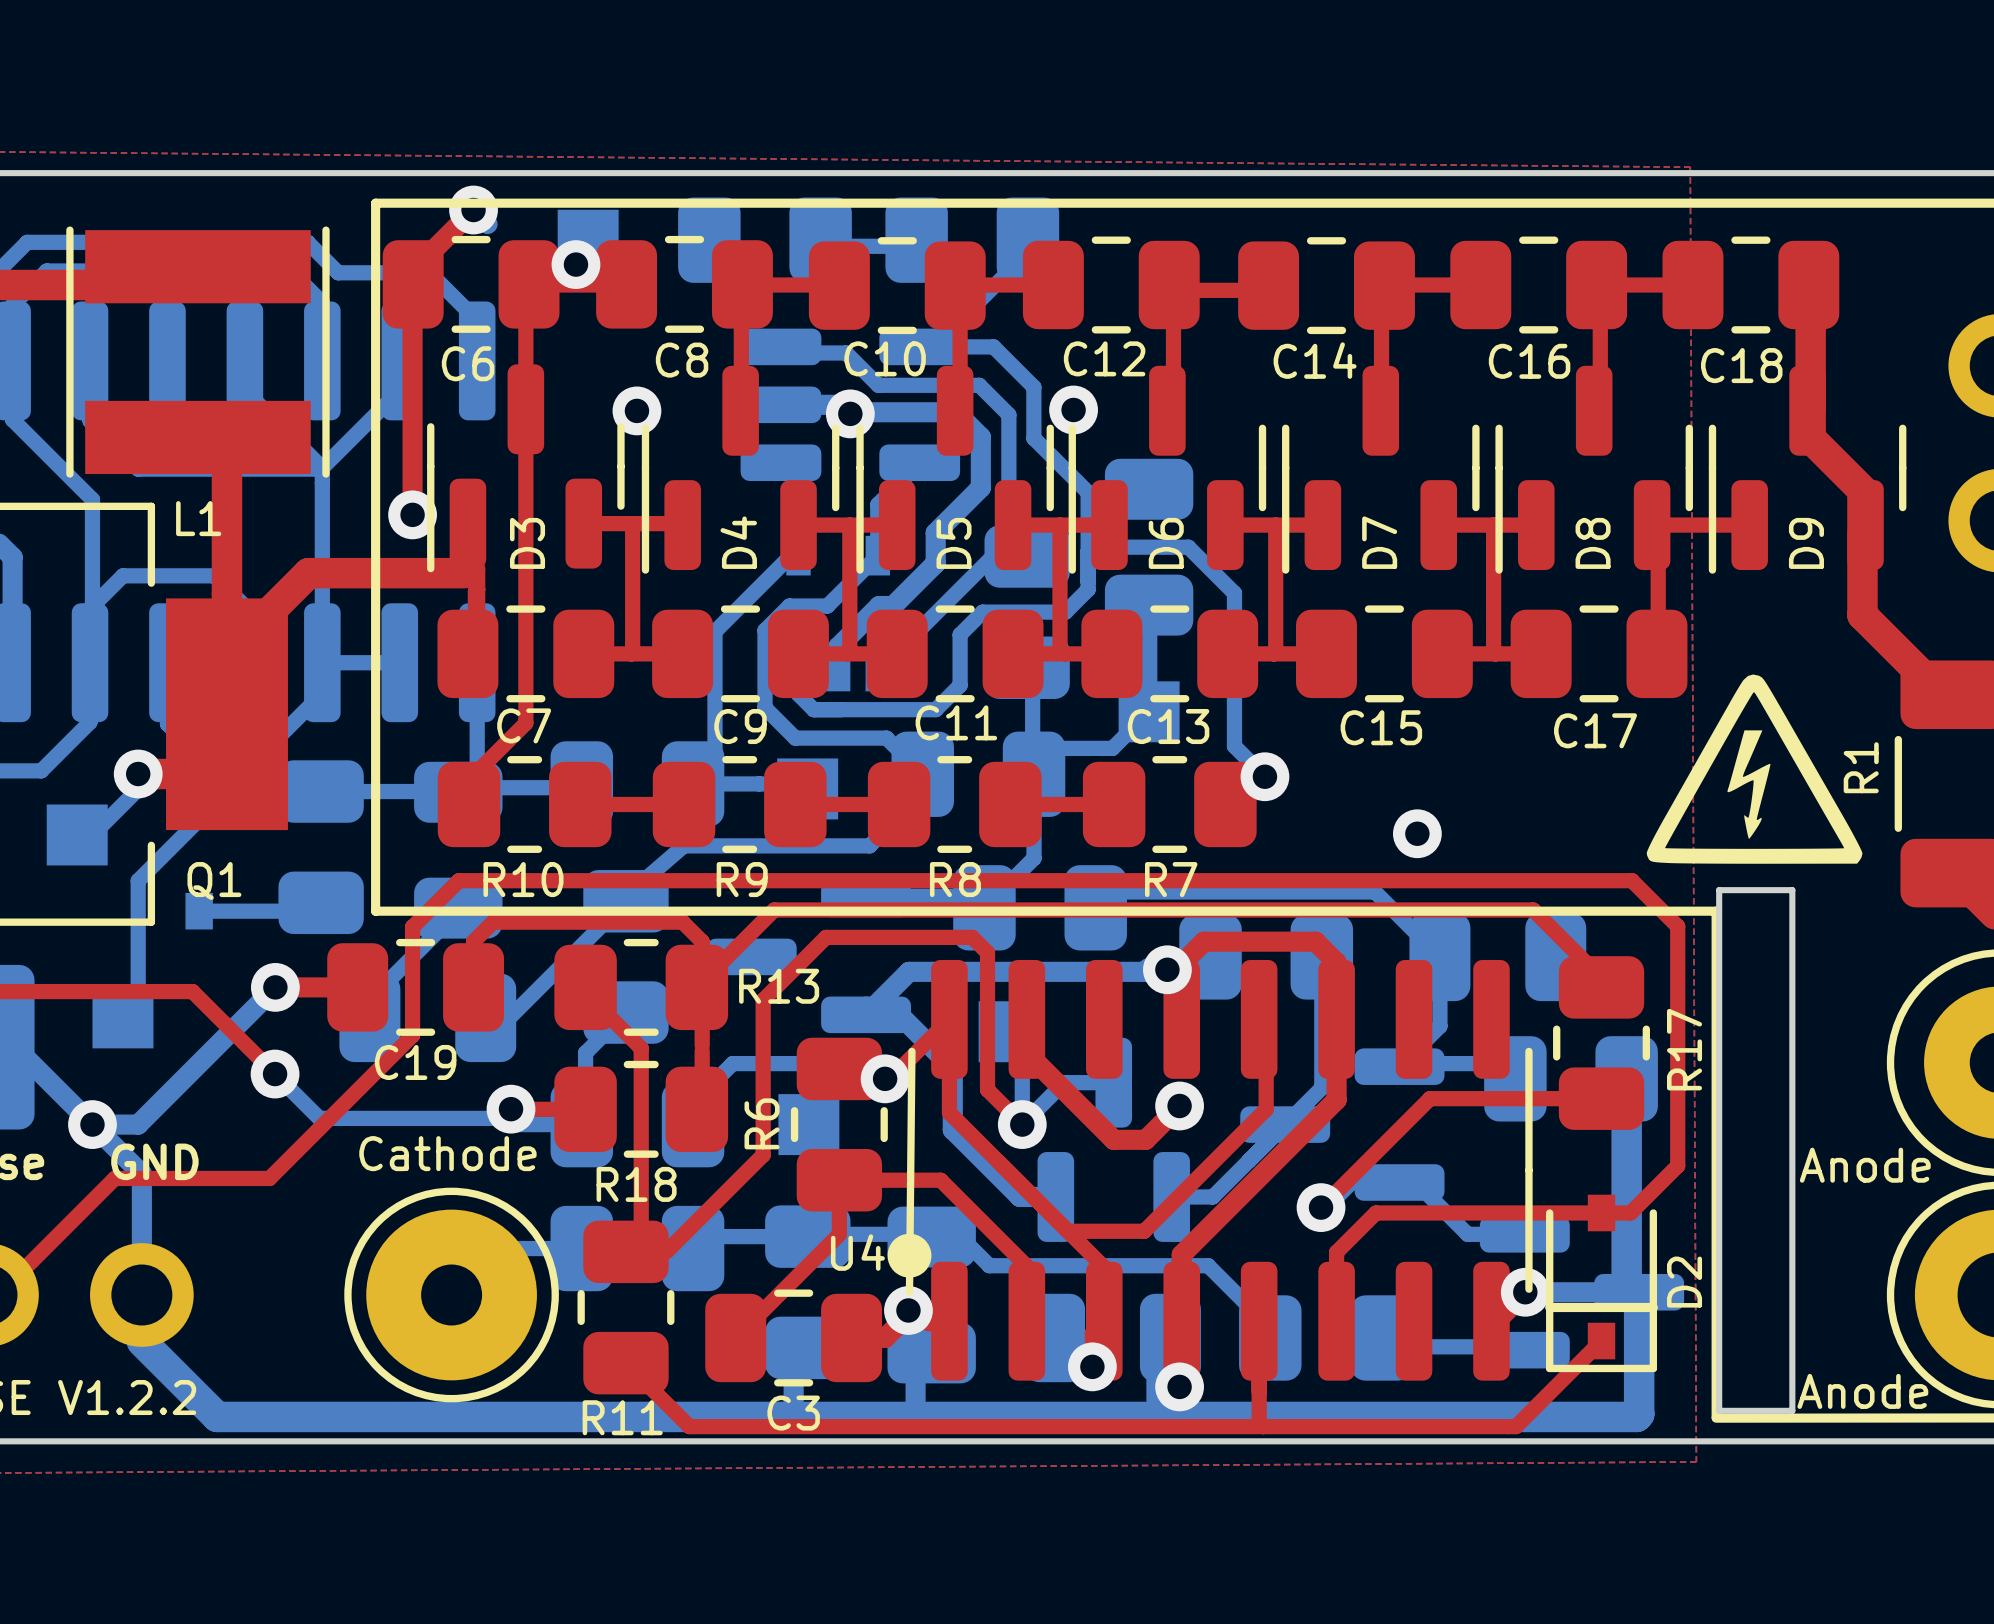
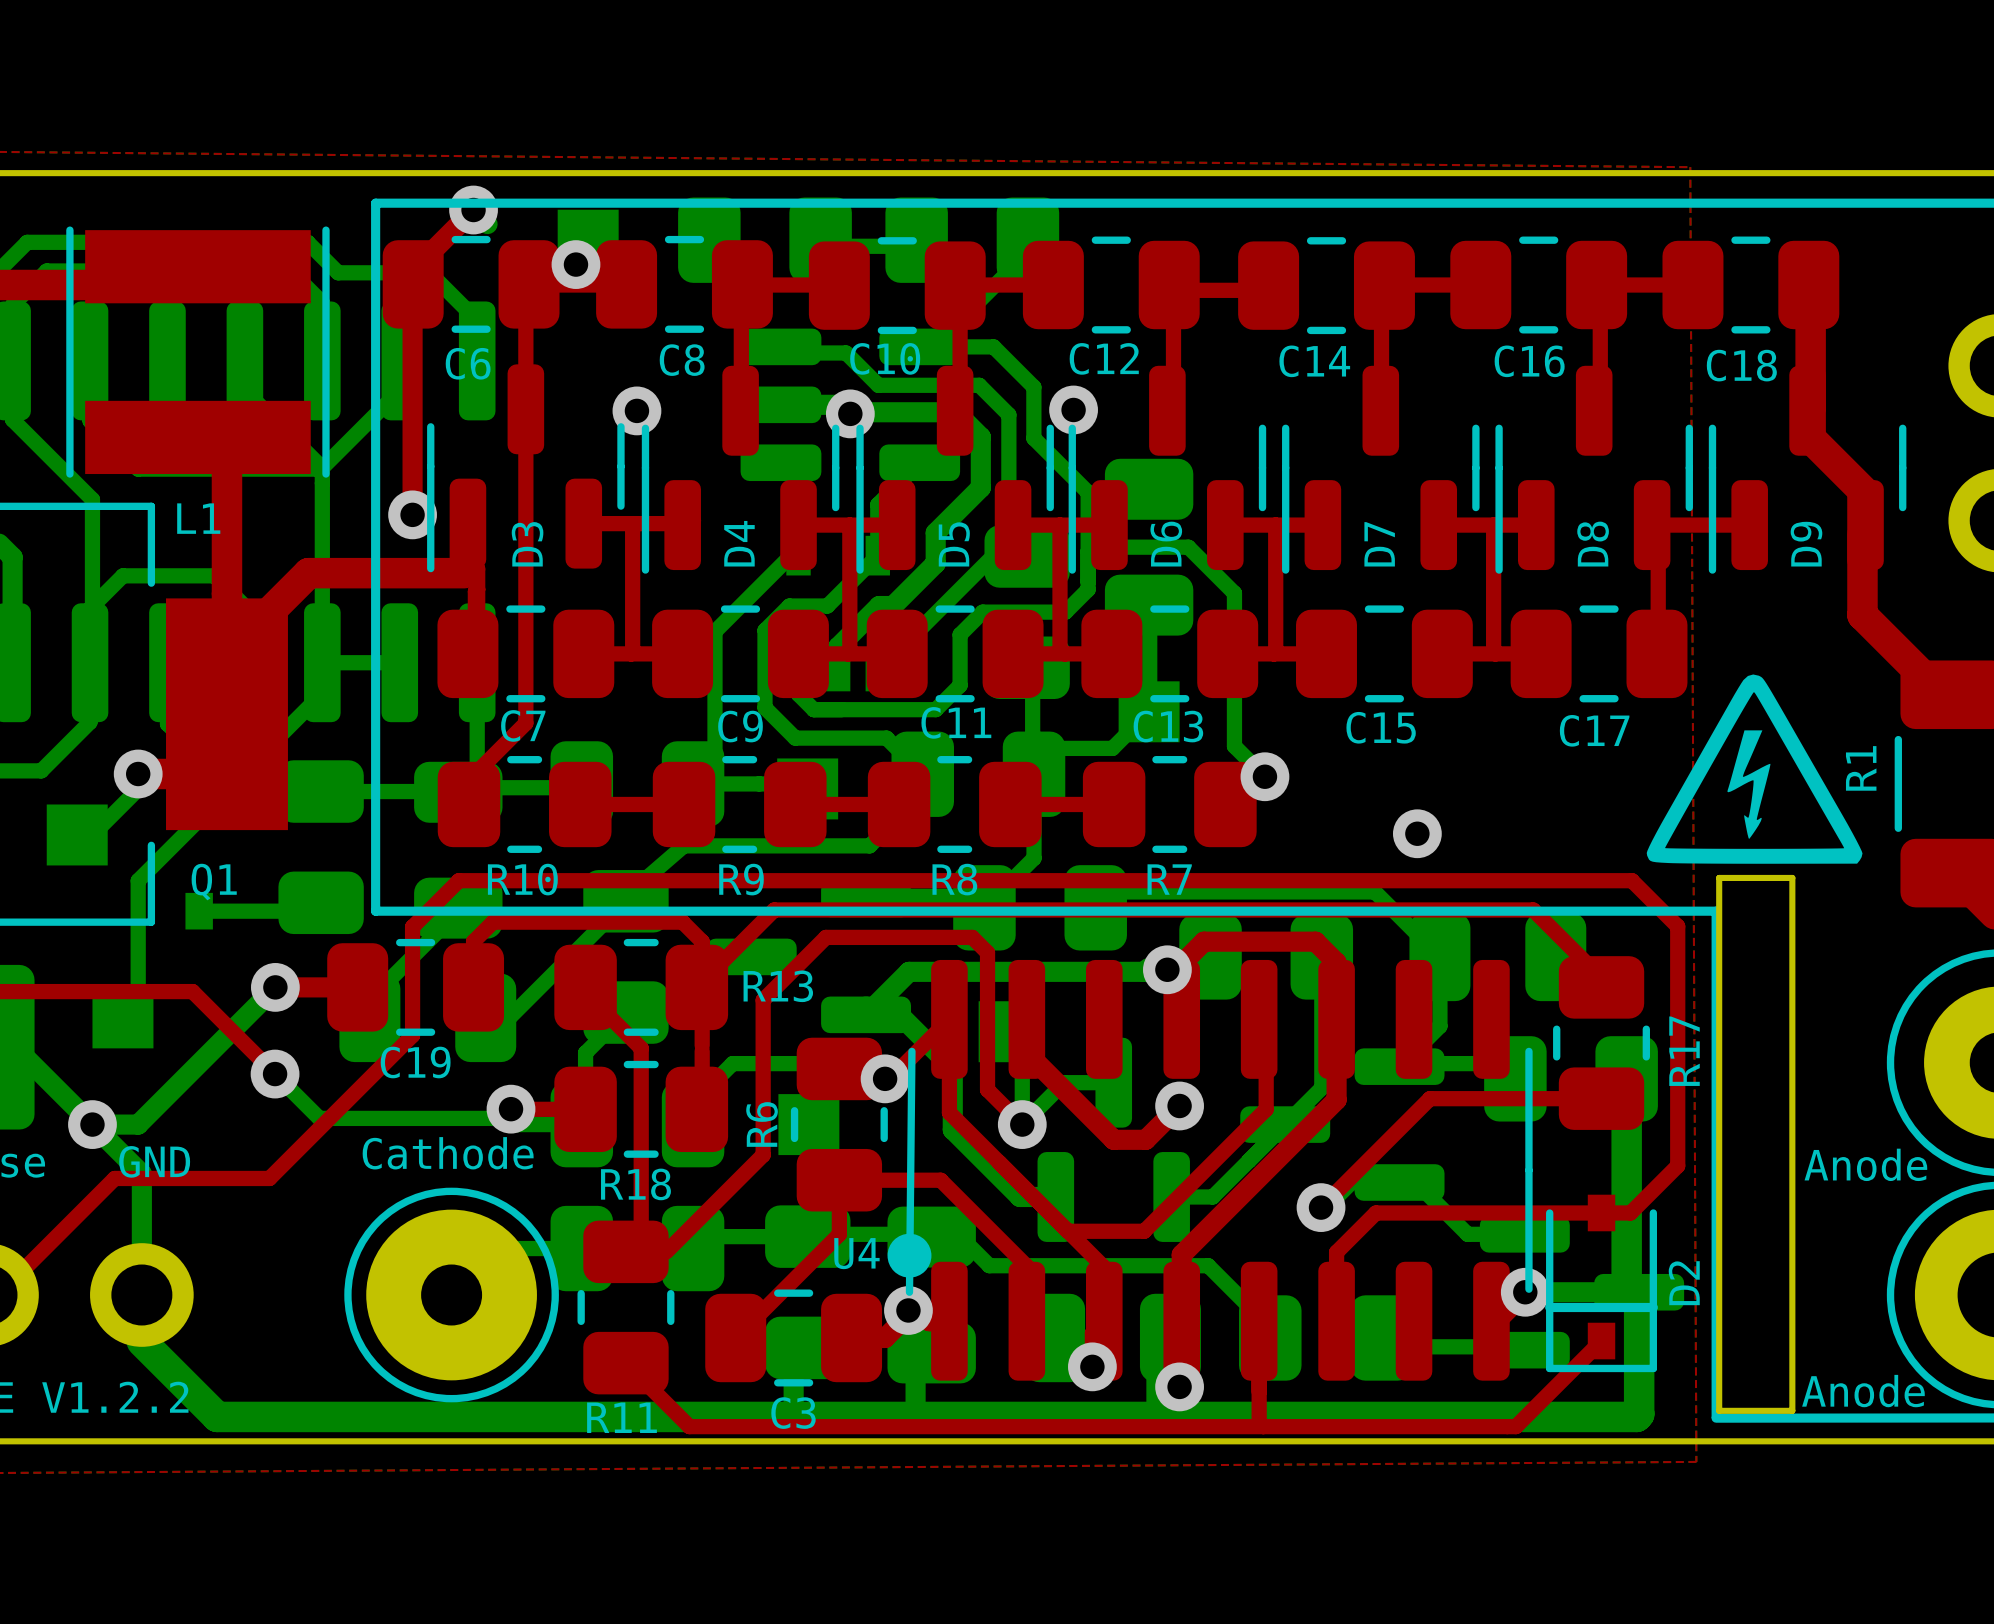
board edge: (1719, 890) (1792, 890) -> (1719, 890) (1719, 877) (1792, 877) (1792, 890)

